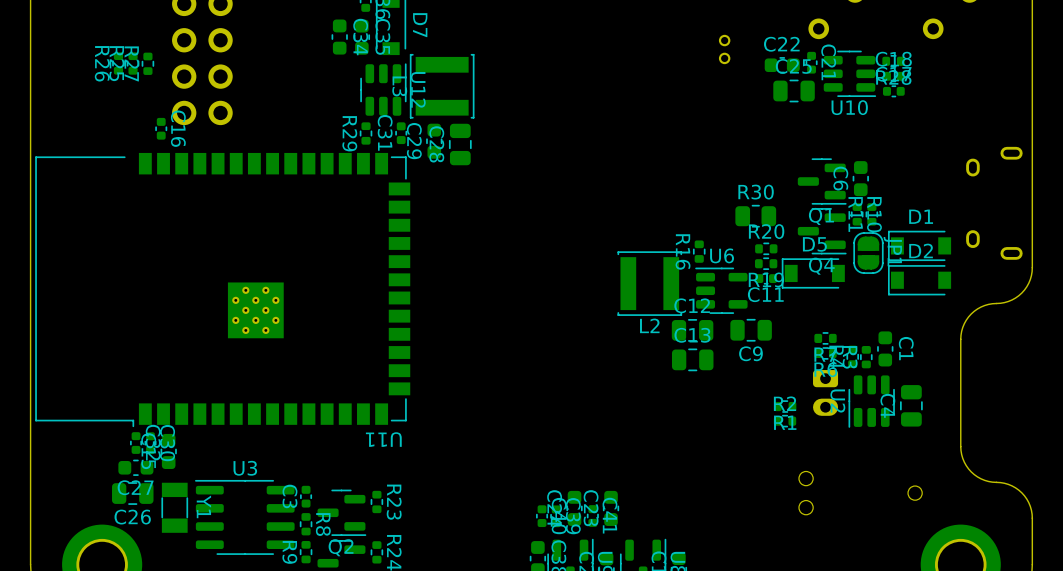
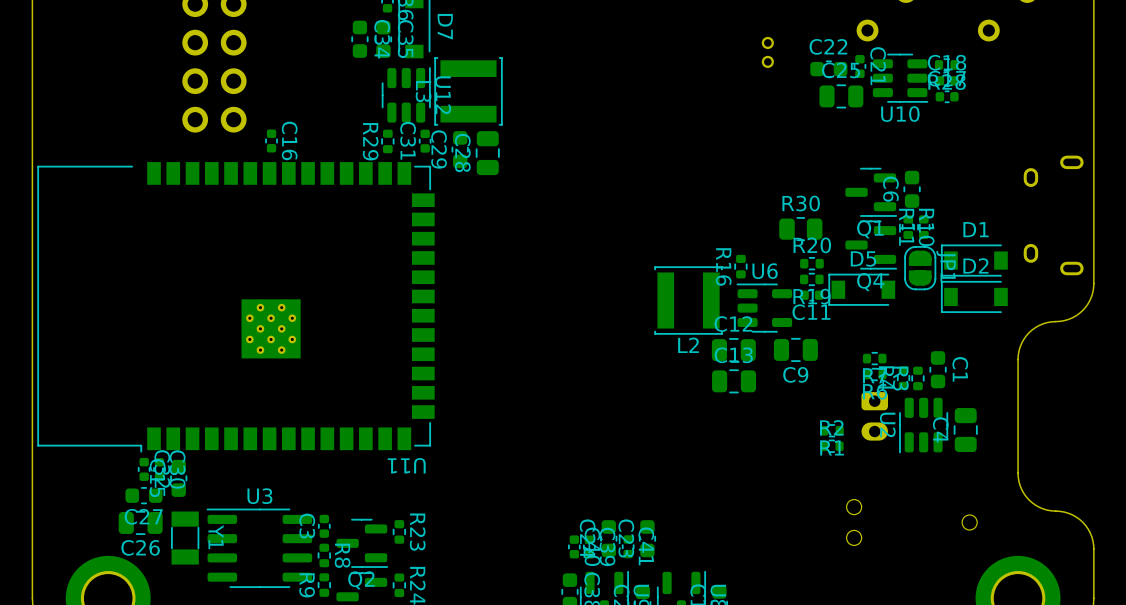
R26: (118, 63) -> none
R25: (133, 63) -> none
R27: (147, 63) -> none
C16 position: (161, 128) -> (271, 140)

